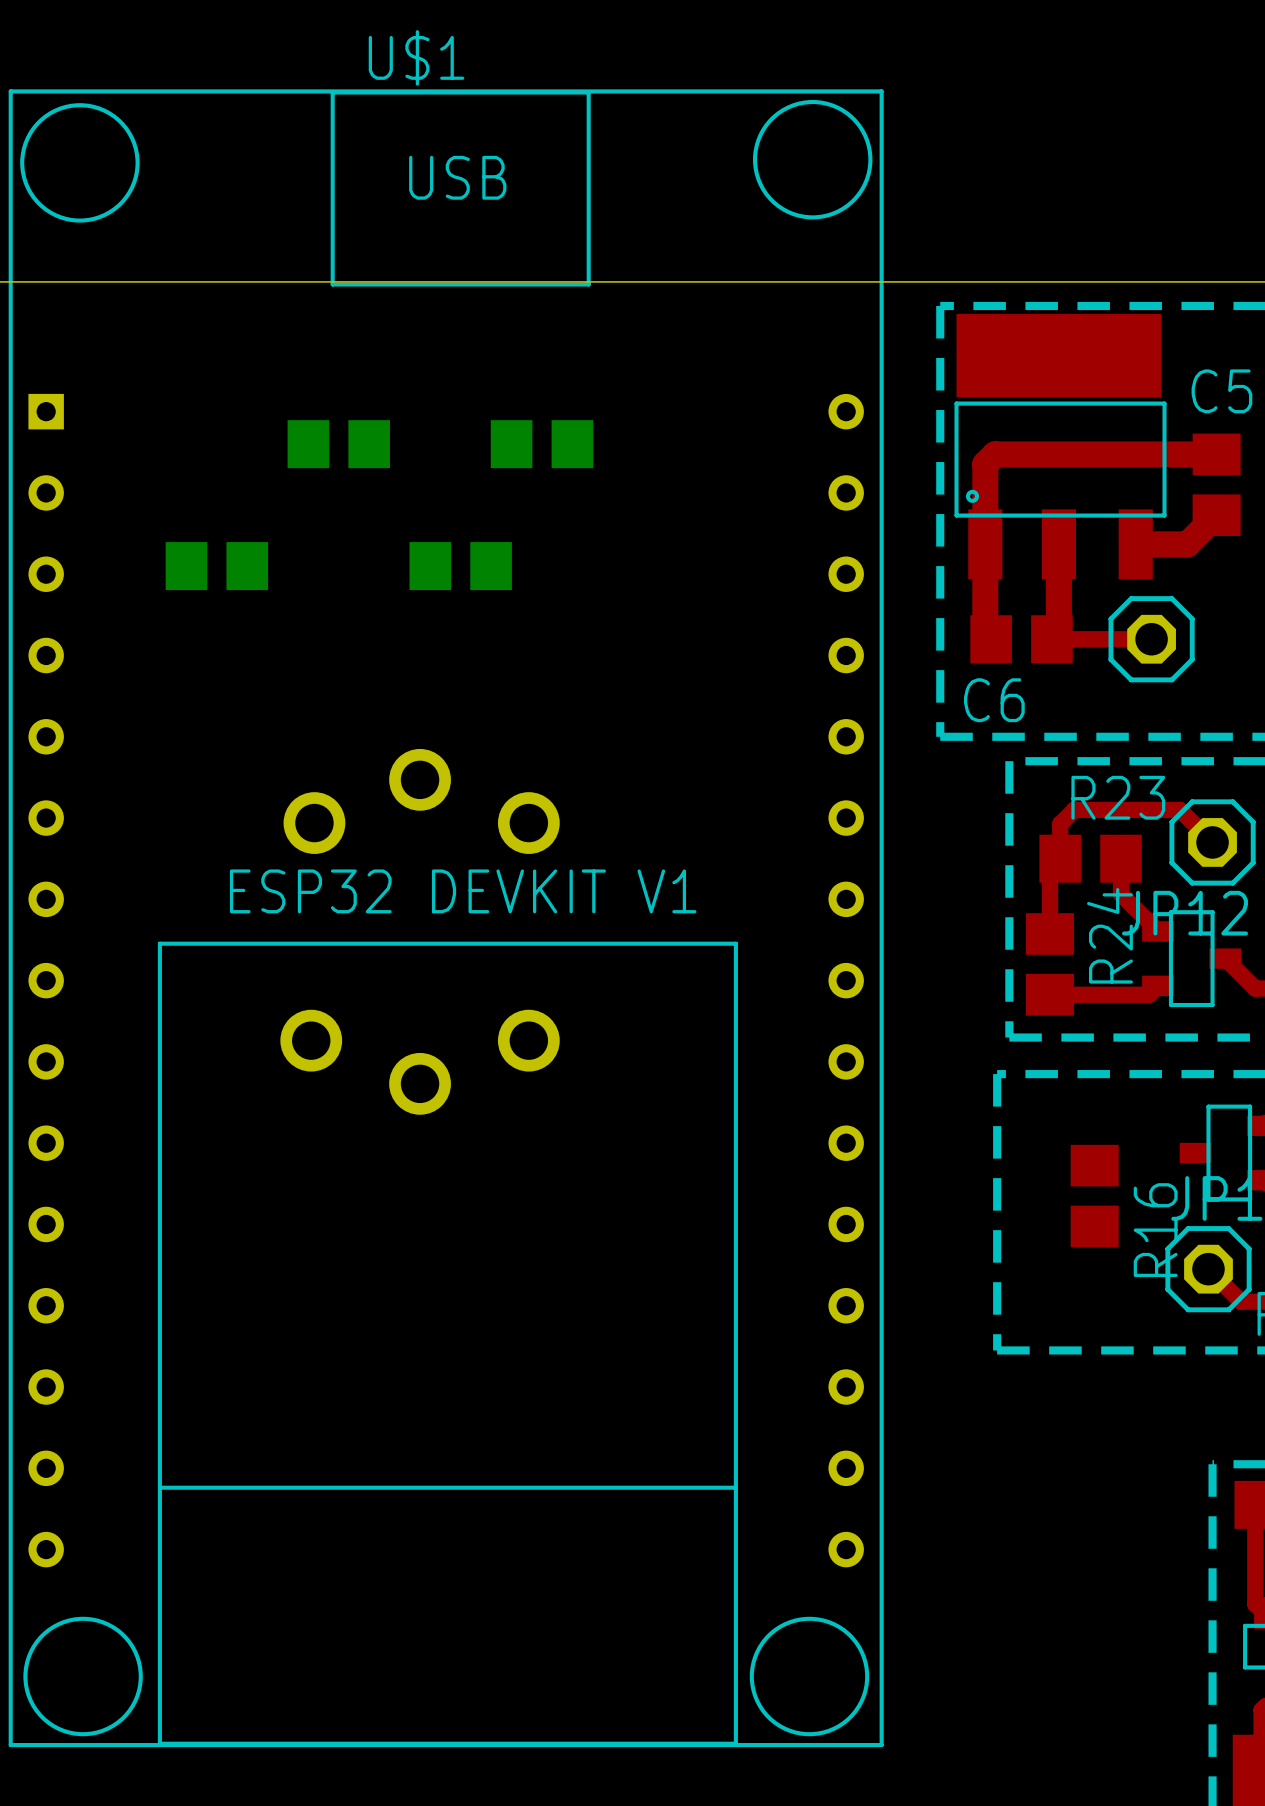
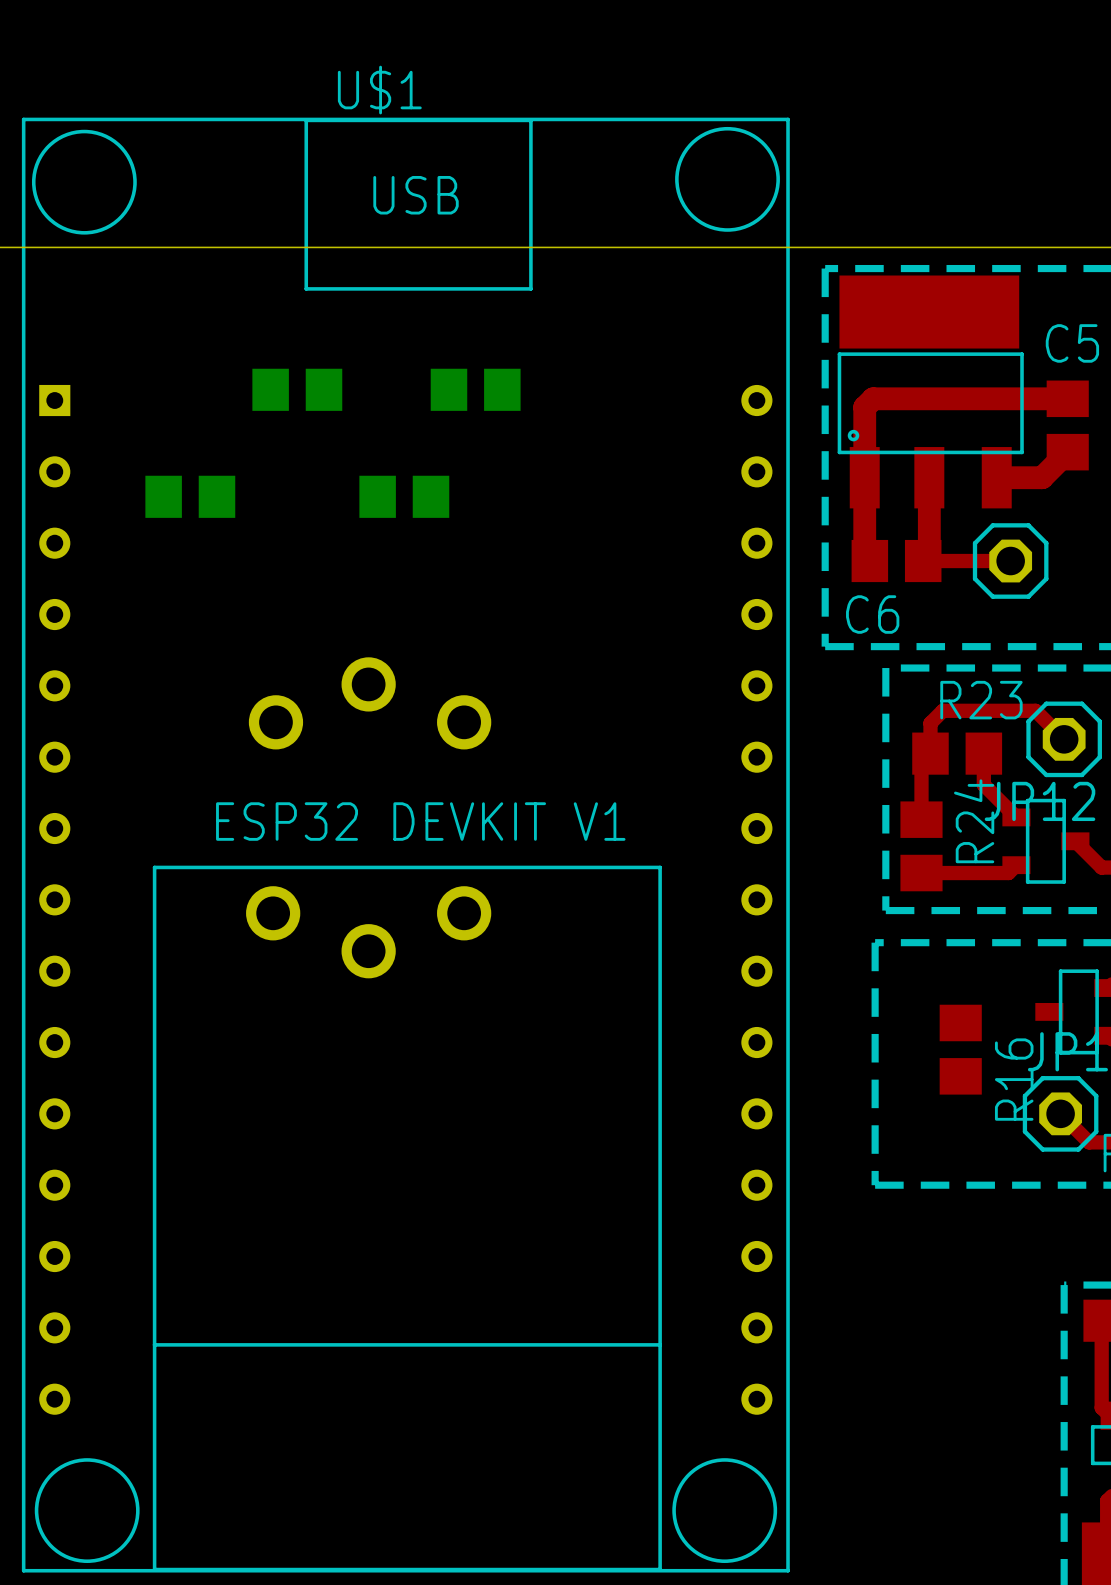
U$1 position: (446, 918) -> (405, 845)

